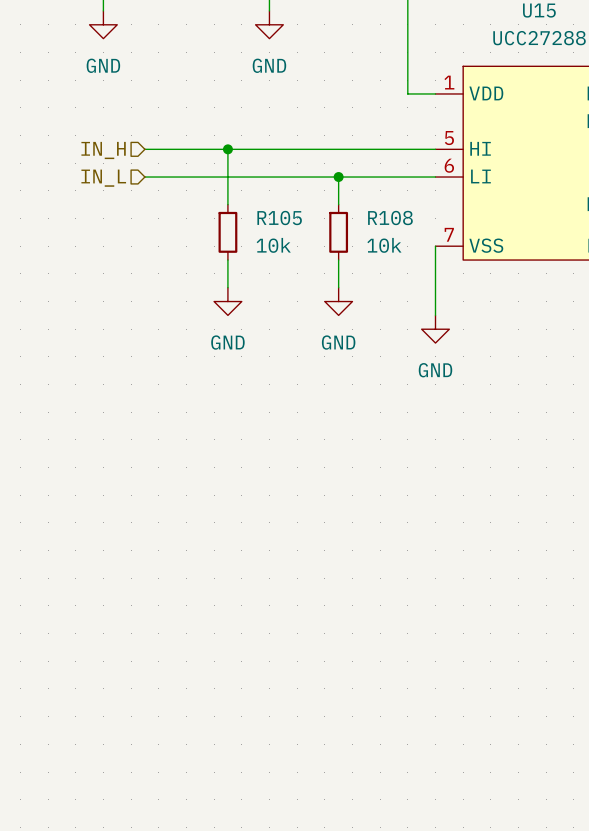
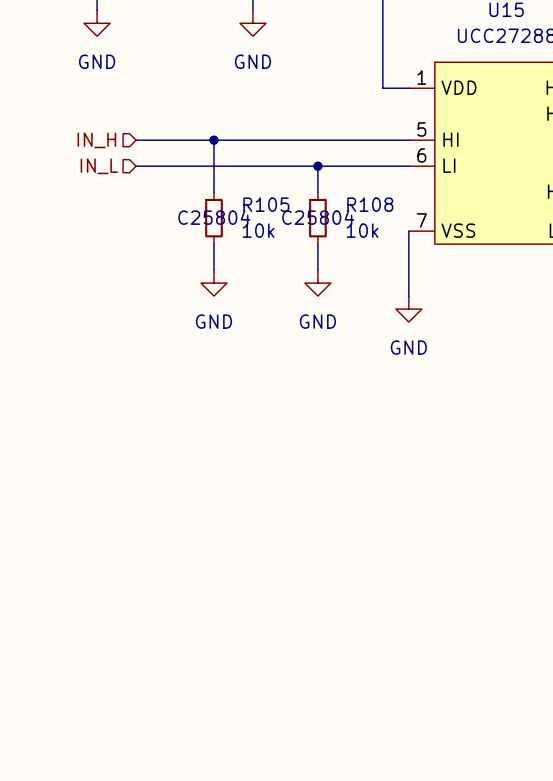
R105 text: none -> C25804 (214, 217)
R108 text: none -> C25804 (318, 217)

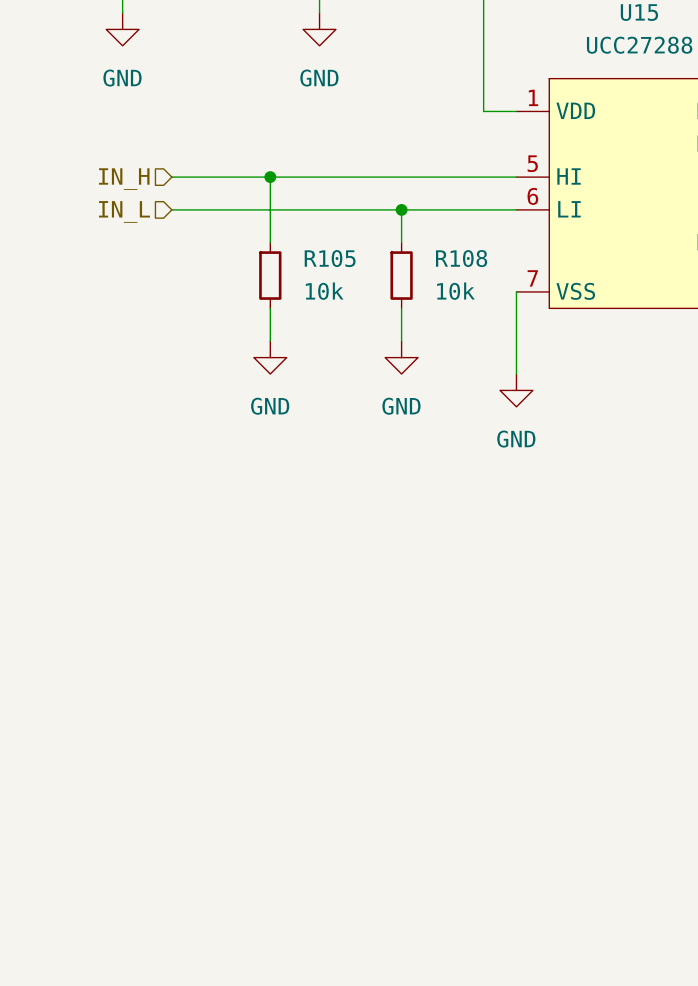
R105 text: C25804 (214, 217) -> none
R108 text: C25804 (318, 217) -> none

